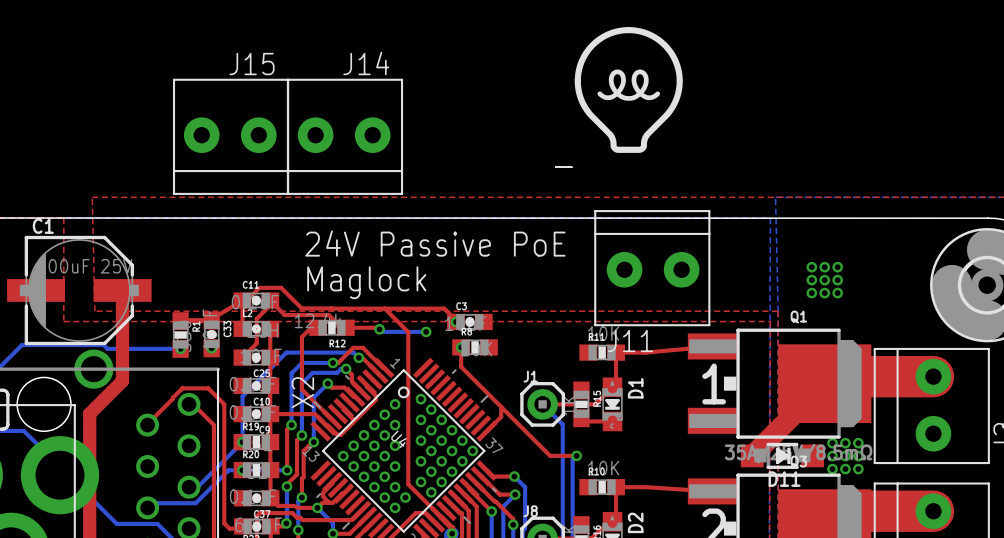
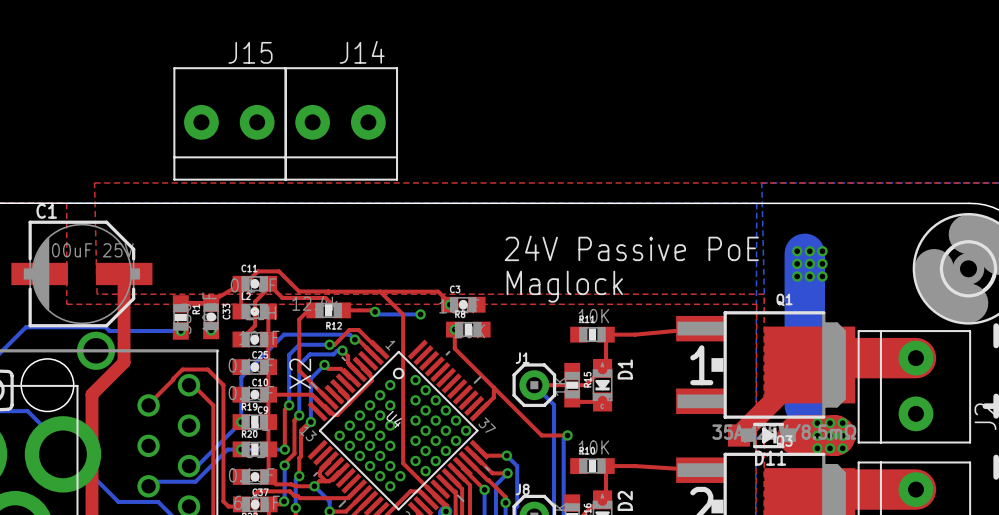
drawing: [574, 27, 683, 153] -> none
text position: 24V Passive PoE (435, 243) -> 24V Passive PoE (631, 248)
J11: (652, 268) -> none
bottom track: none -> (804, 253) (804, 405)
text position: Maglock (366, 282) -> Maglock (564, 286)
top track: none -> (797, 435) (835, 435)

